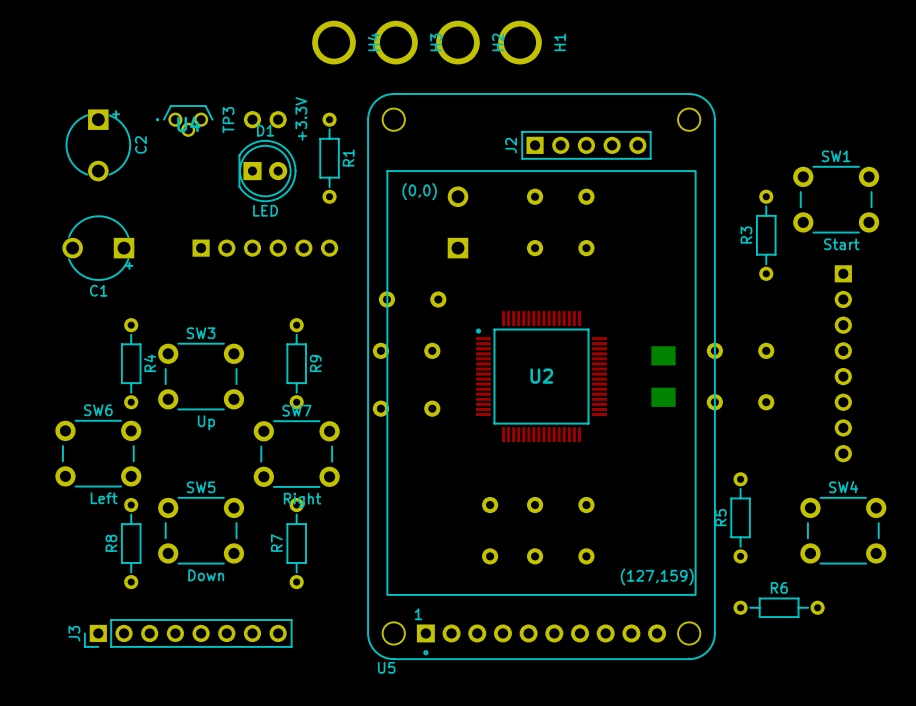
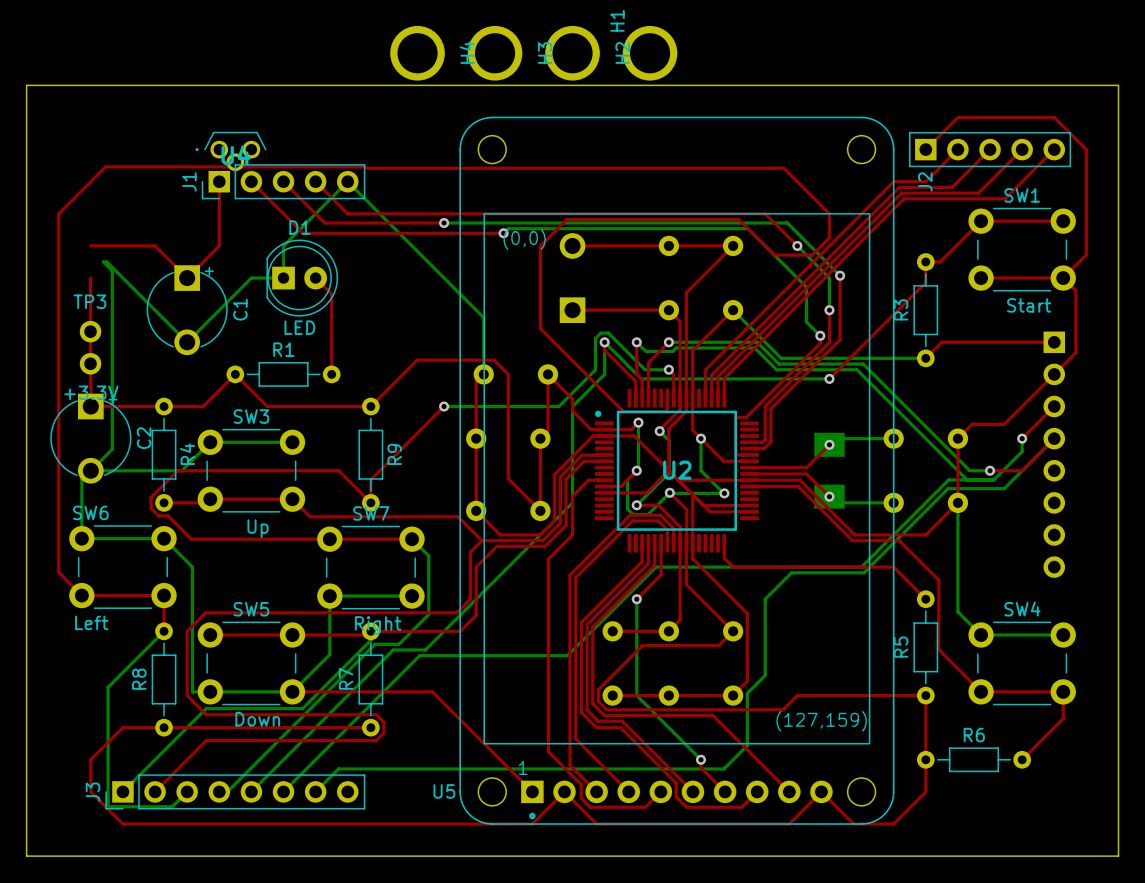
H1 name position: H1 (560, 42) -> H1 (617, 20)
board edge: none -> (26, 85) (1118, 85) (1118, 856) (26, 856) (26, 85)
TP3 rotation: 0° (265, 119) -> 90° clockwise (90, 347)
TP3 position: (265, 119) -> (90, 347)
top track: none -> (925, 149) (957, 117) (1054, 117) (1086, 149) (1086, 254) (1063, 278)
top track: none -> (957, 149) (925, 181) (893, 181) (705, 370) (705, 398)
top track: none -> (990, 149) (952, 187) (899, 187) (711, 375) (711, 398)
top track: none -> (1022, 149) (978, 193) (901, 193) (718, 376) (718, 398)
top track: none -> (1054, 149) (1005, 198) (904, 198) (724, 378) (724, 398)
C2 position: (98, 145) -> (90, 438)
top track: none -> (219, 181) (219, 245) (187, 278) (155, 245) (90, 245)
top track: none -> (251, 181) (302, 233) (503, 233)
top track: none -> (283, 181) (324, 223) (444, 223)
J1: none -> (283, 181)
top track: none -> (315, 181) (347, 213) (765, 213) (797, 245)
J2 name position: J2 (511, 145) -> J2 (925, 182)
J2 position: (586, 145) -> (990, 149)
R1 name position: R1 (348, 157) -> R1 (283, 349)
R1 rotation: 0° (329, 158) -> 90° clockwise (283, 374)
R1 position: (329, 158) -> (283, 374)
D1 position: (267, 171) -> (302, 278)
top track: none -> (1063, 221) (981, 221) (940, 262) (925, 262) (925, 282) (829, 378)
bottom track: none -> (444, 223) (787, 223) (840, 275)
via: none -> (444, 223)
bottom track: none -> (503, 233) (508, 228) (747, 228) (806, 287) (806, 322) (820, 335)
via: none -> (503, 233)
top track: none -> (572, 245) (733, 245) (686, 292) (686, 411) (668, 428) (668, 470) (646, 492) (604, 492)
bottom track: none -> (797, 245) (829, 278) (829, 310)
via: none -> (797, 245)
SW1 position: (836, 199) -> (1022, 249)
top track: none -> (840, 275) (840, 339) (770, 408) (770, 442) (764, 448) (749, 448)
via: none -> (840, 275)
top track: none -> (90, 278) (90, 406) (203, 406) (235, 374) (267, 406) (370, 406) (417, 360) (494, 360) (508, 374) (508, 478) (540, 510) (540, 438) (547, 431) (547, 374) (572, 398) (572, 410) (591, 429) (631, 429) (638, 422)
top track: none -> (315, 278) (331, 294) (331, 374)
top track: none -> (981, 278) (1063, 278)
top track: none -> (1063, 278) (1075, 290) (1075, 352) (1004, 424) (972, 424) (957, 438) (957, 502) (925, 534) (854, 534) (800, 480) (678, 480)
R3 position: (766, 235) -> (925, 310)
C1 rotation: 0° (98, 248) -> 90° counterclockwise (187, 310)
C1 position: (98, 248) -> (187, 310)
part: (265, 248) -> none
top track: none -> (572, 310) (668, 310) (680, 321) (680, 409) (659, 431)
top track: none -> (733, 310) (692, 350) (692, 430) (723, 461) (749, 461)
bottom track: none -> (733, 310) (781, 358) (925, 358)
top track: none -> (829, 310) (829, 342) (765, 406) (765, 439) (762, 442) (749, 442)
via: none -> (829, 310)
top track: none -> (820, 335) (820, 343) (746, 417) (736, 417) (736, 454) (749, 454)
via: none -> (820, 335)
top track: none -> (604, 342) (604, 350) (635, 381) (635, 398)
via: none -> (604, 342)
top track: none -> (636, 342) (636, 374) (642, 379) (642, 398)
bottom track: none -> (636, 342) (645, 351) (672, 351) (676, 347) (754, 347) (776, 369) (856, 369) (967, 479)
via: none -> (636, 342)
top track: none -> (668, 342) (648, 362) (648, 398)
bottom track: none -> (668, 342) (757, 342) (778, 364) (863, 364) (969, 470) (990, 470)
via: none -> (668, 342)
top track: none -> (1054, 342) (941, 342) (925, 358)
top track: none -> (668, 369) (673, 374) (673, 398)
bottom track: none -> (668, 369) (645, 369) (608, 333) (600, 333) (595, 338) (595, 369) (558, 406) (444, 406)
via: none -> (668, 369)
top track: none -> (483, 374) (476, 381) (476, 510) (500, 534) (540, 534) (554, 520) (554, 474) (593, 435) (634, 435) (709, 511) (742, 511)
bottom track: none -> (483, 374) (483, 317) (347, 181) (283, 245) (283, 278) (251, 278) (187, 342) (106, 262) (103, 262) (112, 270) (112, 449) (81, 479) (81, 538) (164, 538) (192, 567) (192, 691) (292, 691) (329, 654) (329, 596) (412, 596)
bottom track: none -> (829, 378) (641, 378) (604, 342) (604, 374) (572, 406) (572, 502) (425, 649) (393, 649) (251, 791)
via: none -> (829, 378)
top track: none -> (667, 398) (667, 411) (623, 411) (540, 328) (540, 245) (566, 219) (738, 219) (774, 255) (812, 255) (829, 237) (829, 213) (783, 168) (105, 166) (58, 213) (58, 572) (81, 595) (164, 595) (164, 631)
top track: none -> (444, 406) (370, 479) (370, 502) (338, 470) (177, 470) (151, 497) (151, 508) (158, 515) (168, 515) (191, 539) (412, 539)
via: none -> (444, 406)
top track: none -> (1054, 406) (1022, 438)
bottom track: none -> (638, 422) (638, 469) (627, 479) (627, 509) (632, 514) (648, 514) (669, 492) (724, 493)
via: none -> (638, 422)
bottom track: none -> (659, 431) (669, 440) (669, 472) (636, 505)
via: none -> (659, 431)
bottom track: none -> (701, 438) (701, 470) (723, 493)
via: none -> (701, 438)
bottom track: none -> (893, 438) (835, 438) (829, 444)
bottom track: none -> (1022, 438) (1022, 451) (993, 479) (948, 479) (861, 567) (655, 567) (567, 655) (419, 655) (283, 791)
via: none -> (1022, 438)
top track: none -> (1054, 438) (1022, 470) (990, 470)
bottom track: none -> (1054, 438) (1004, 488) (948, 488) (863, 572) (791, 572) (765, 599) (765, 675) (747, 693) (747, 745) (723, 768) (338, 768) (315, 791)
bottom track: none -> (292, 442) (210, 442) (181, 470) (90, 470)
top track: none -> (829, 444) (806, 467) (749, 467)
via: none -> (829, 444)
top track: none -> (604, 455) (582, 455) (560, 476) (560, 523) (542, 540) (481, 540)
top track: none -> (604, 461) (584, 461) (566, 479) (566, 525) (545, 546) (496, 546) (476, 567) (476, 615) (460, 631) (370, 631) (367, 634) (210, 634)
top track: none -> (636, 470) (620, 486) (604, 486)
via: none -> (636, 470)
via: none -> (990, 470)
top track: none -> (749, 473) (806, 473) (829, 496)
top track: none -> (604, 480) (588, 480) (572, 496) (572, 534) (548, 559) (548, 751) (581, 784) (581, 798) (590, 807) (645, 807) (660, 791)
top track: none -> (749, 486) (798, 486) (852, 540) (899, 540) (938, 580) (938, 649) (981, 691) (1063, 691) (1063, 718) (1022, 759)
top track: none -> (669, 492) (686, 509) (686, 584) (733, 631) (718, 645) (642, 645) (598, 689) (598, 701) (606, 709) (783, 709) (797, 695) (925, 695) (925, 791) (893, 824) (853, 824) (821, 791) (789, 824) (596, 824) (564, 791) (532, 824) (122, 824) (90, 791) (90, 759) (122, 727) (370, 727)
via: none -> (669, 492)
via: none -> (724, 493)
top track: none -> (692, 494) (692, 558) (747, 613) (747, 681) (733, 695) (612, 695)
bottom track: none -> (829, 496) (835, 502) (893, 502)
via: none -> (829, 496)
top track: none -> (164, 502) (206, 502) (210, 499) (292, 499) (310, 516) (458, 516) (481, 540)
bottom track: none -> (957, 502) (957, 611) (981, 634) (1063, 634)
top track: none -> (636, 505) (658, 505) (680, 526) (680, 620) (668, 631) (612, 631)
via: none -> (636, 505)
top track: none -> (703, 505) (749, 505)
SW6 name position: SW6 (98, 410) -> SW6 (90, 512)
bottom track: none -> (412, 539) (428, 555) (428, 614) (399, 644) (374, 644) (227, 791) (219, 791)
top track: none -> (481, 540) (470, 552) (470, 599) (456, 612) (205, 612) (187, 631) (187, 695) (206, 714) (376, 714) (383, 722) (383, 733) (376, 740) (206, 740) (155, 791)
top track: none -> (642, 543) (642, 561) (581, 622) (581, 712) (596, 727) (620, 727) (676, 783) (676, 796) (686, 807) (741, 807) (757, 791)
top track: none -> (648, 543) (648, 563) (587, 624) (587, 710) (598, 721) (622, 721) (692, 791)
top track: none -> (654, 543) (654, 565) (592, 627) (592, 703) (604, 715) (712, 715) (789, 791)
top track: none -> (661, 543) (661, 574) (636, 599)
top track: none -> (667, 543) (667, 530) (658, 520) (632, 520) (575, 577) (575, 738) (628, 791)
top track: none -> (673, 543) (673, 528) (660, 515) (630, 515) (570, 575) (570, 765) (596, 791)
top track: none -> (724, 543) (724, 558) (733, 567) (893, 567) (925, 599)
bottom track: none -> (636, 599) (636, 695) (701, 759)
via: none -> (636, 599)
SW6 value position: Left (104, 498) -> Left (91, 622)
bottom track: none -> (164, 631) (108, 687) (108, 806) (172, 806) (187, 791)
bottom track: none -> (370, 631) (370, 640) (302, 708) (206, 708) (122, 791)
SW4 position: (843, 530) -> (1022, 663)
top track: none -> (292, 691) (432, 691) (532, 791)
top track: none -> (701, 759) (701, 767) (725, 791)
via: none -> (701, 759)
U5 name position: U5 (386, 667) -> U5 (444, 791)

